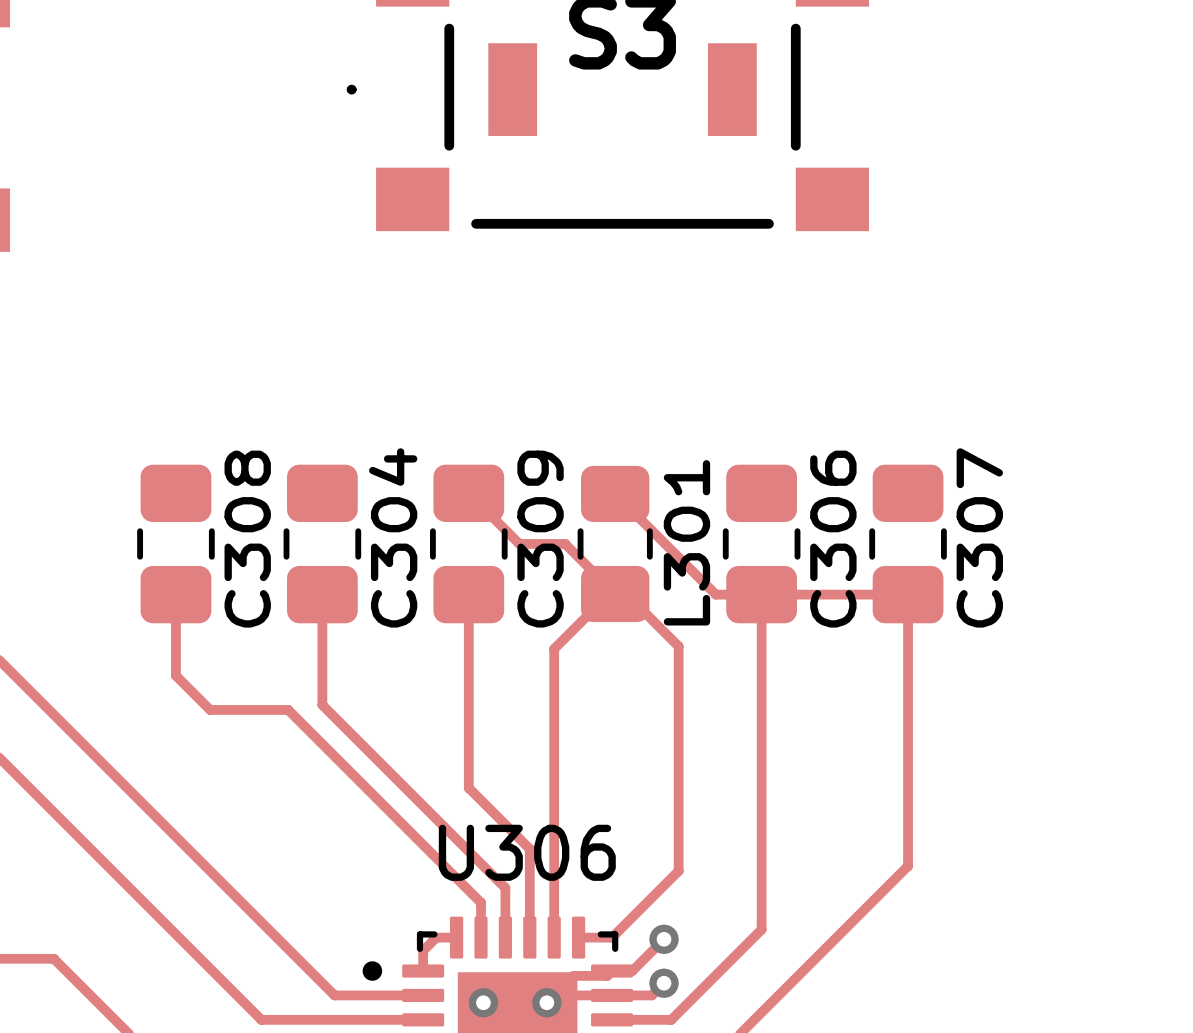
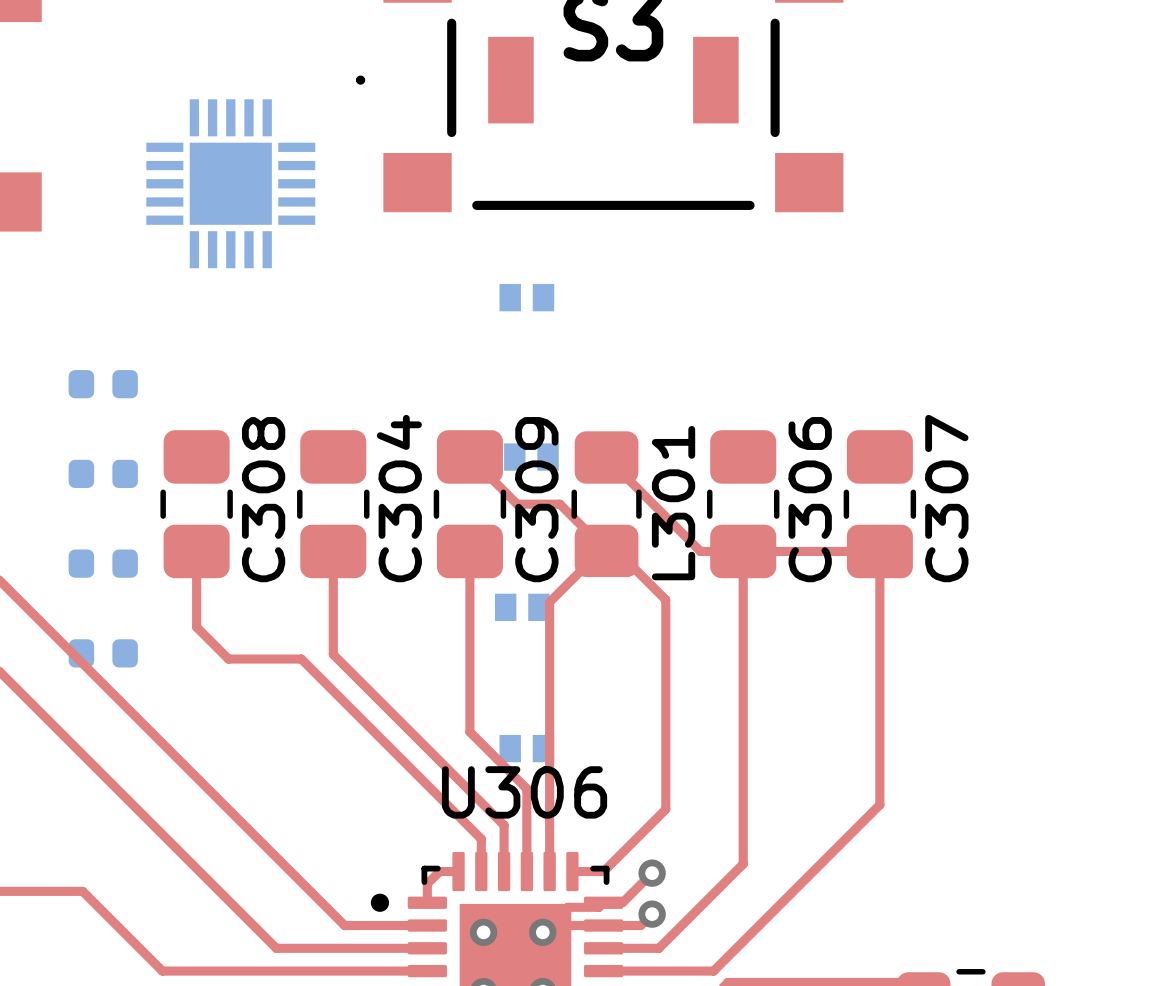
part: none -> (230, 183)
part: none -> (526, 297)
part: none -> (103, 384)
part: none -> (531, 457)
part: none -> (103, 473)
part: none -> (103, 563)
part: none -> (522, 607)
part: none -> (103, 653)
part: none -> (526, 748)

